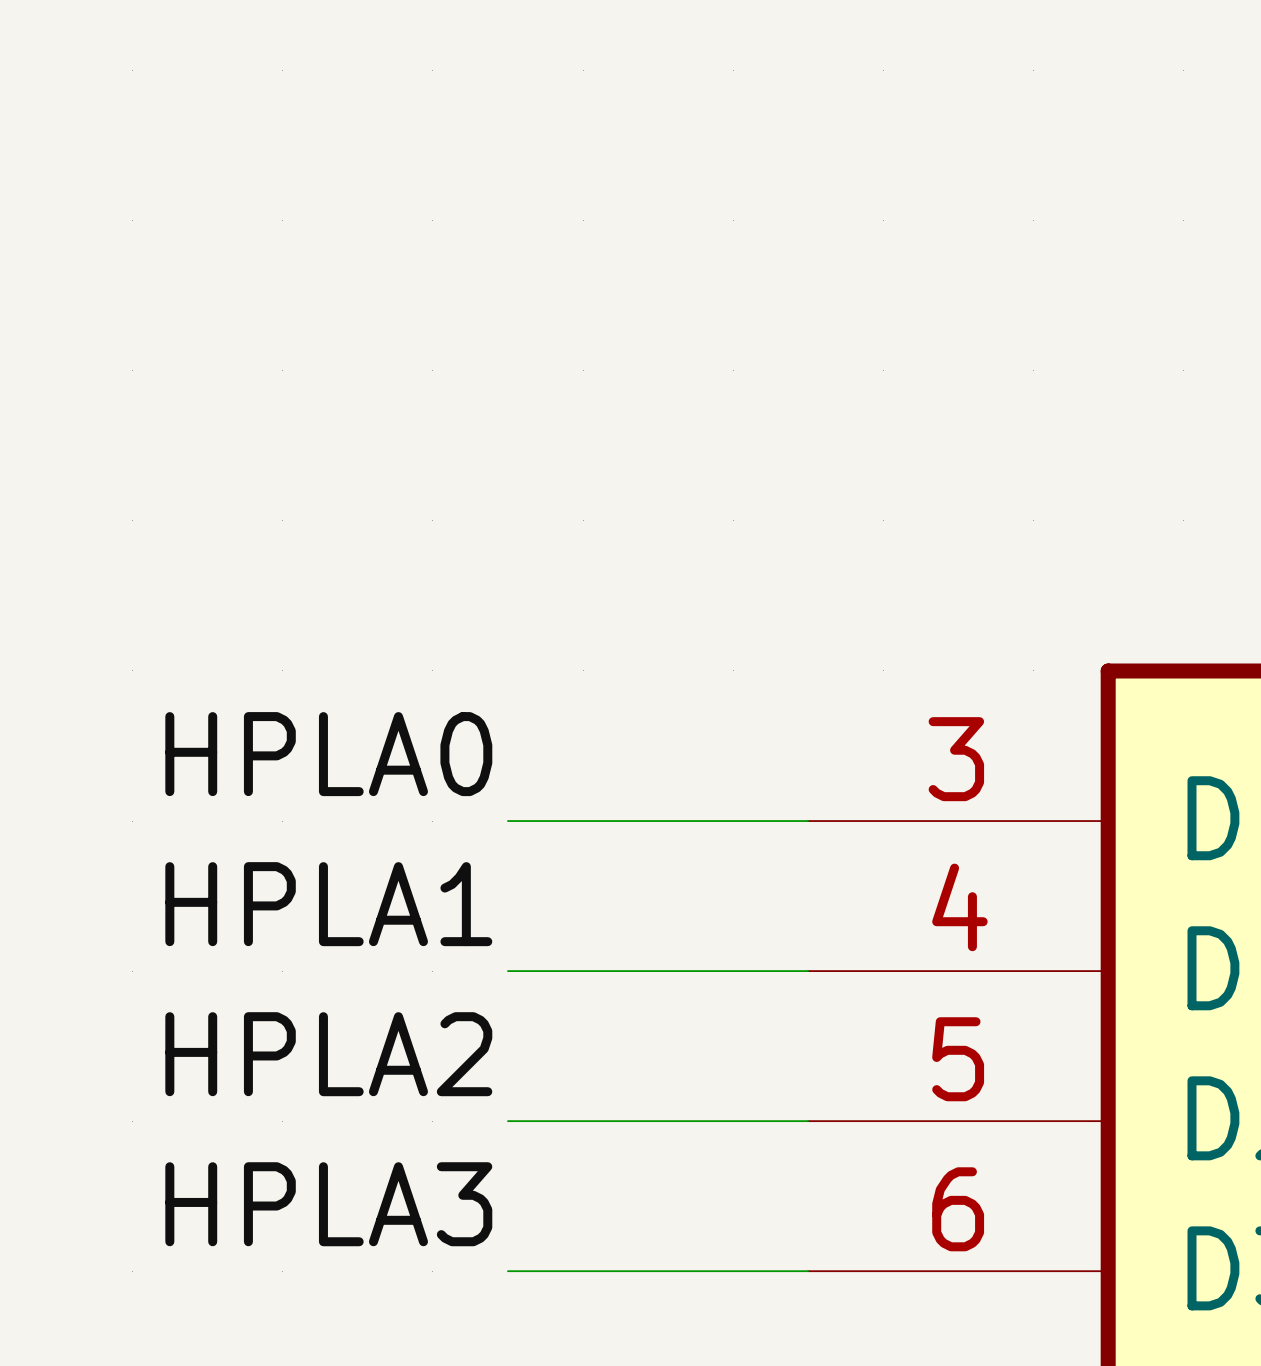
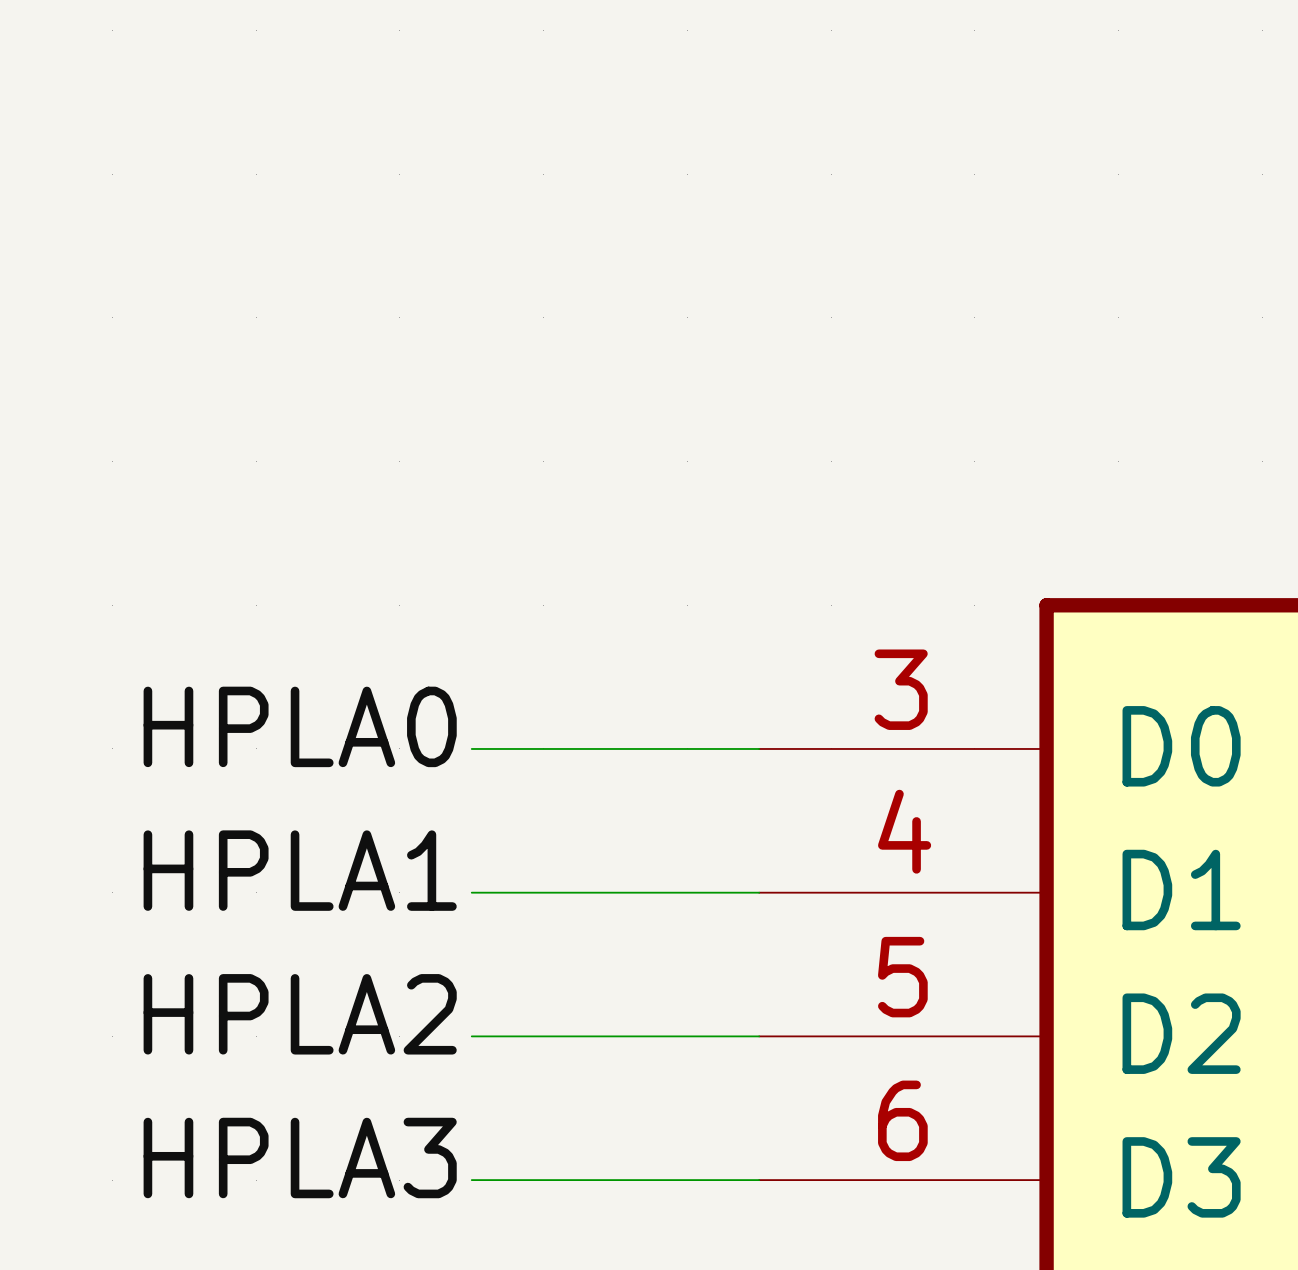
label position: HPLA0 (328, 754) -> HPLA0 (300, 726)
label position: HPLA1 (328, 904) -> HPLA1 (300, 870)
label position: HPLA2 (328, 1054) -> HPLA2 (300, 1014)
label position: HPLA3 (328, 1204) -> HPLA3 (300, 1158)

